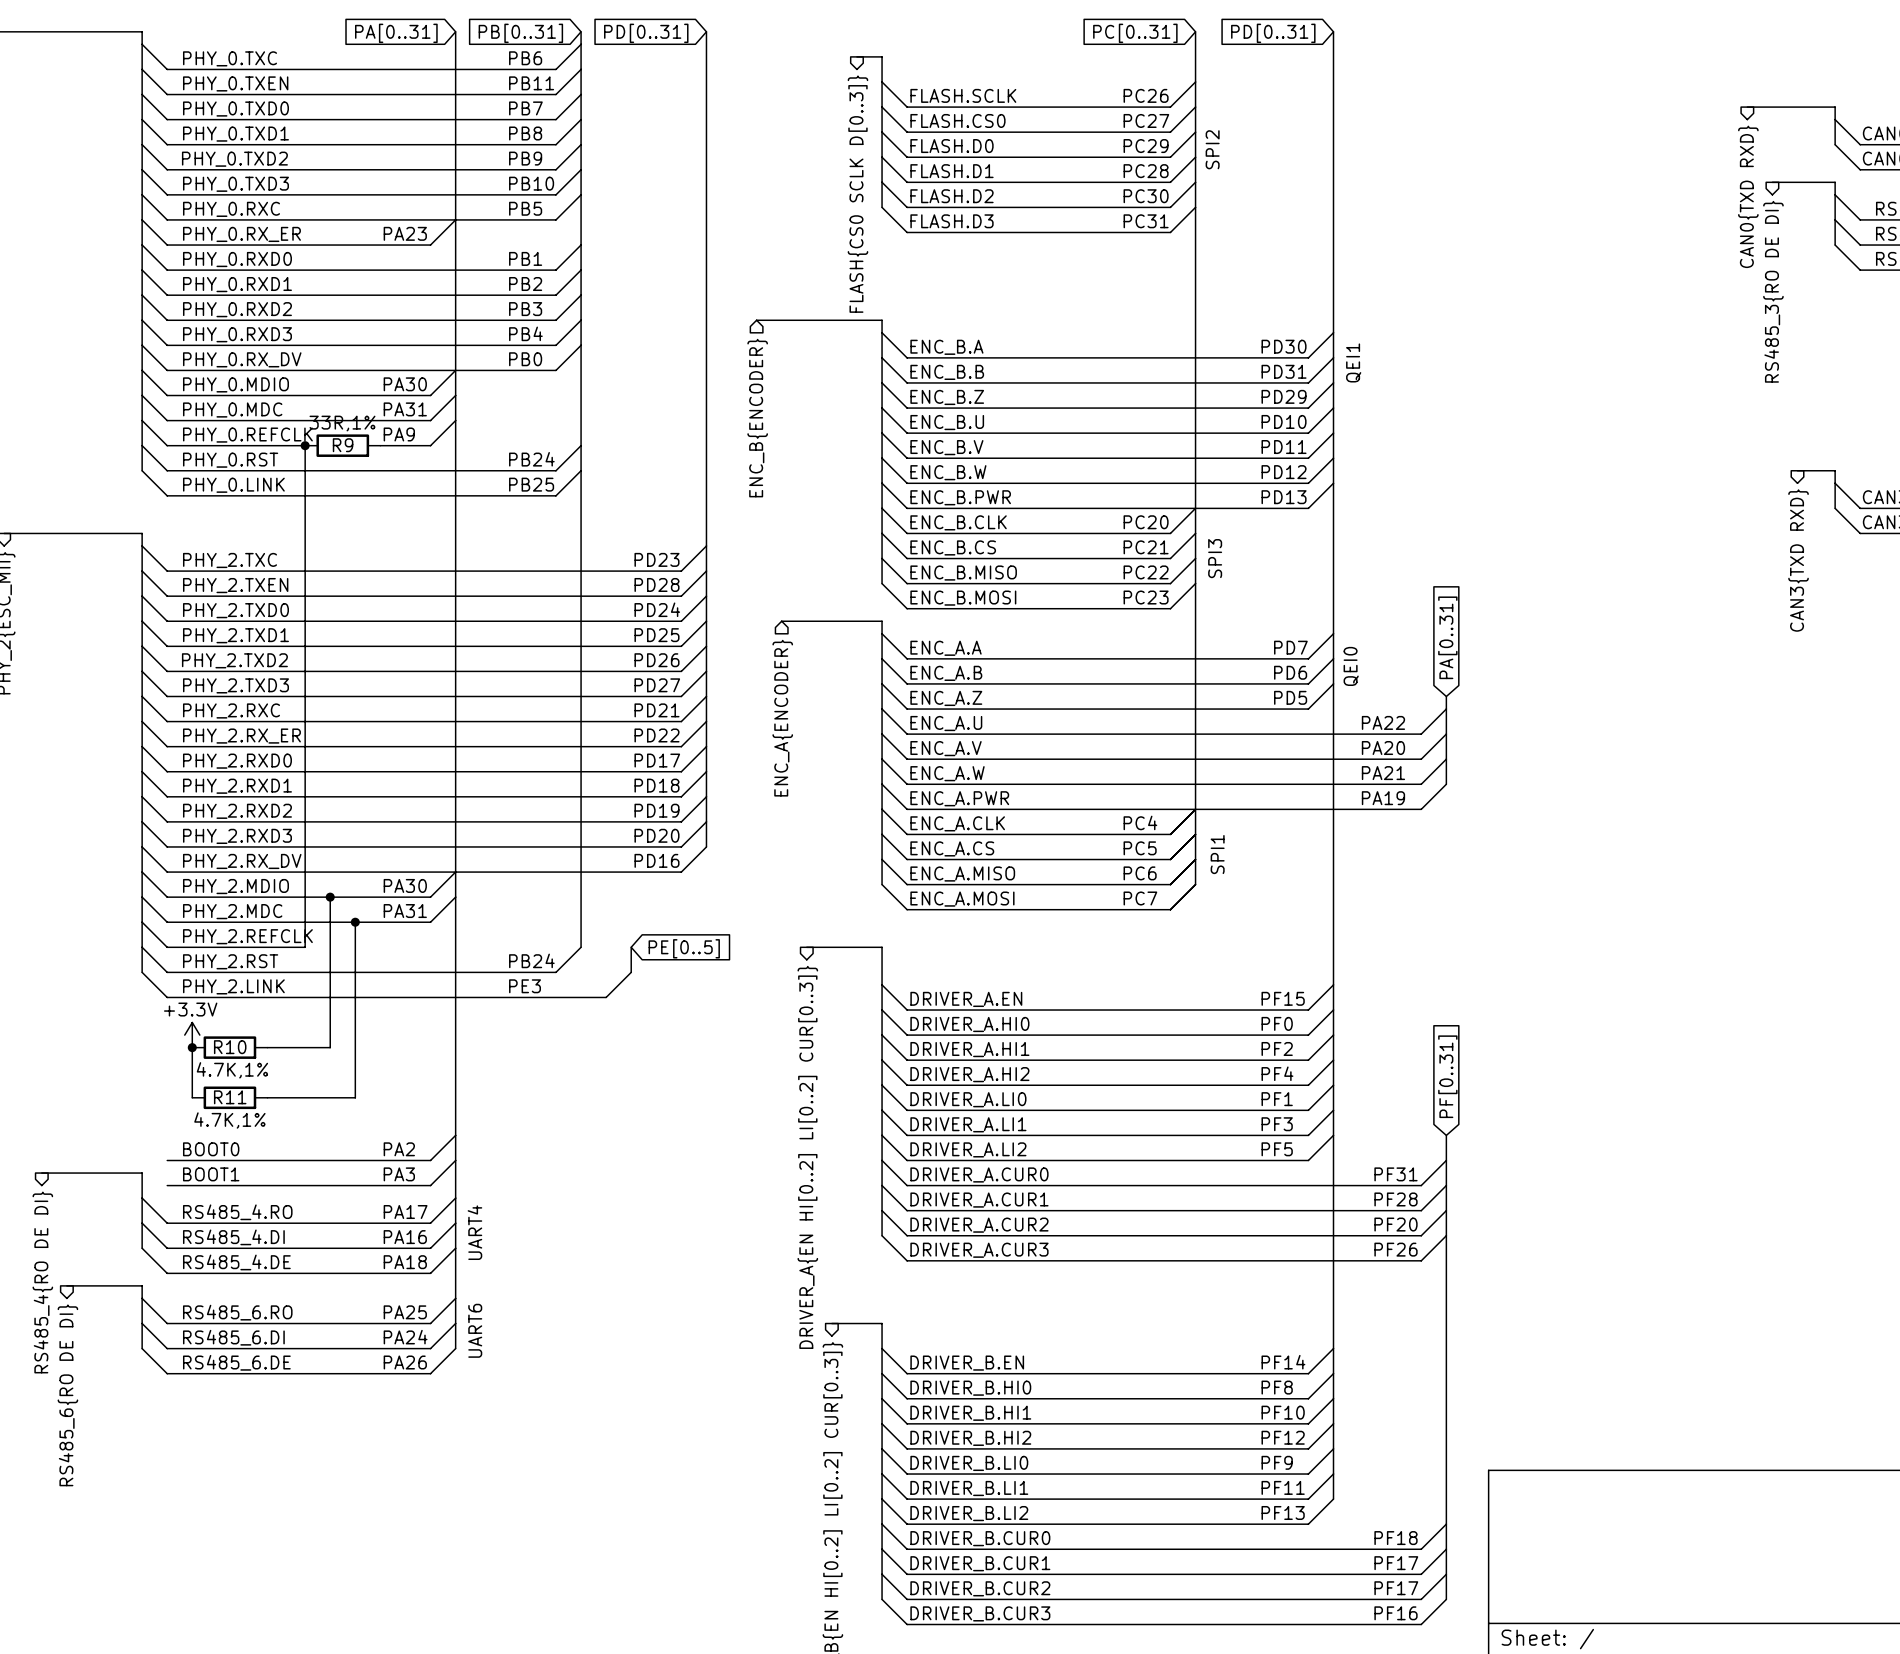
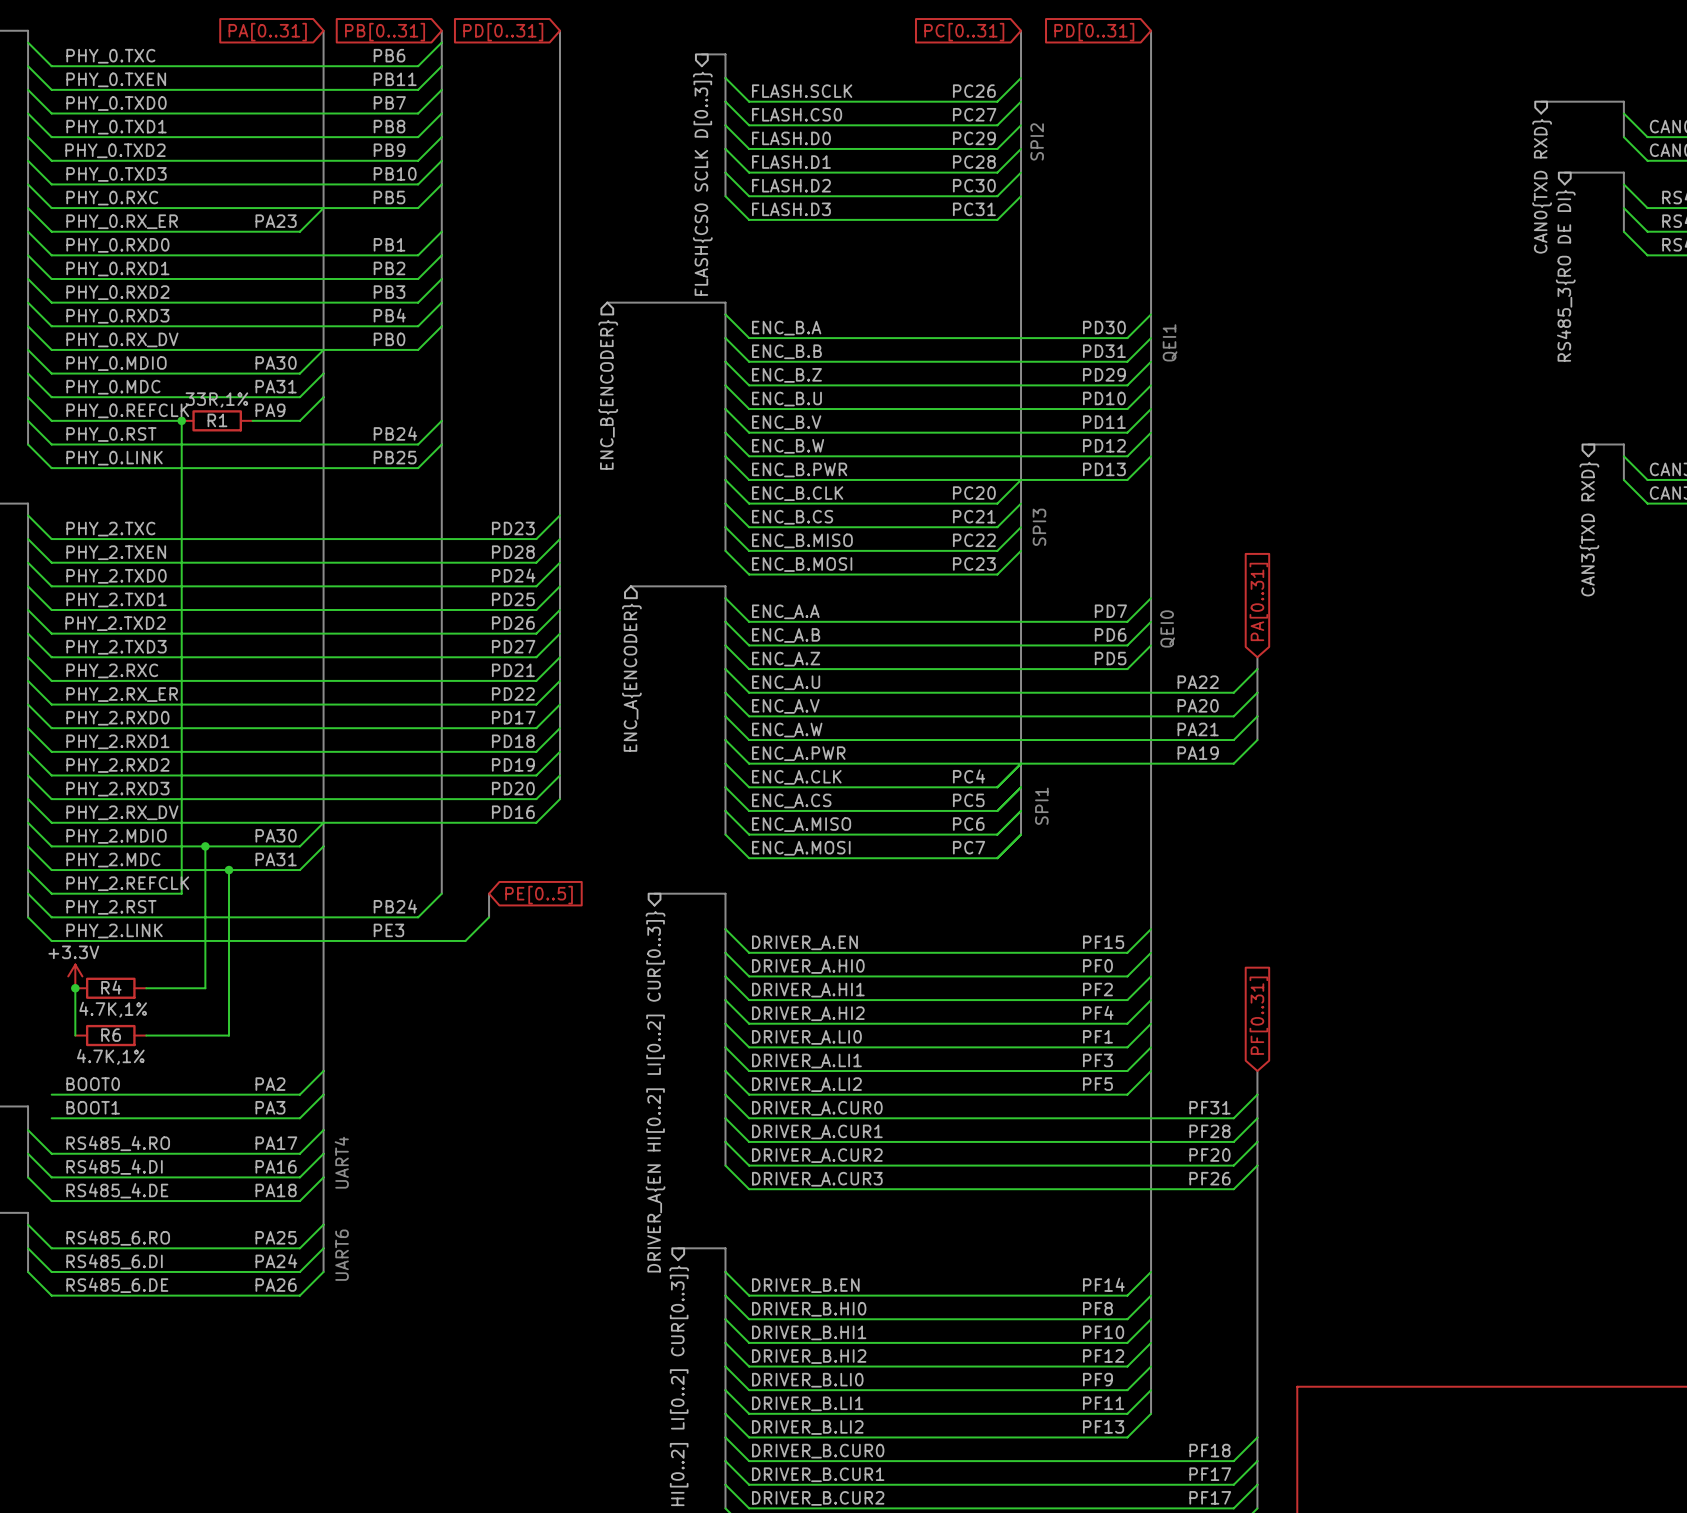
R9 name: R9 (343, 445) -> R1 (217, 420)
R10 name: R10 (230, 1047) -> R4 (111, 987)
R11 name: R11 (230, 1097) -> R6 (111, 1035)

